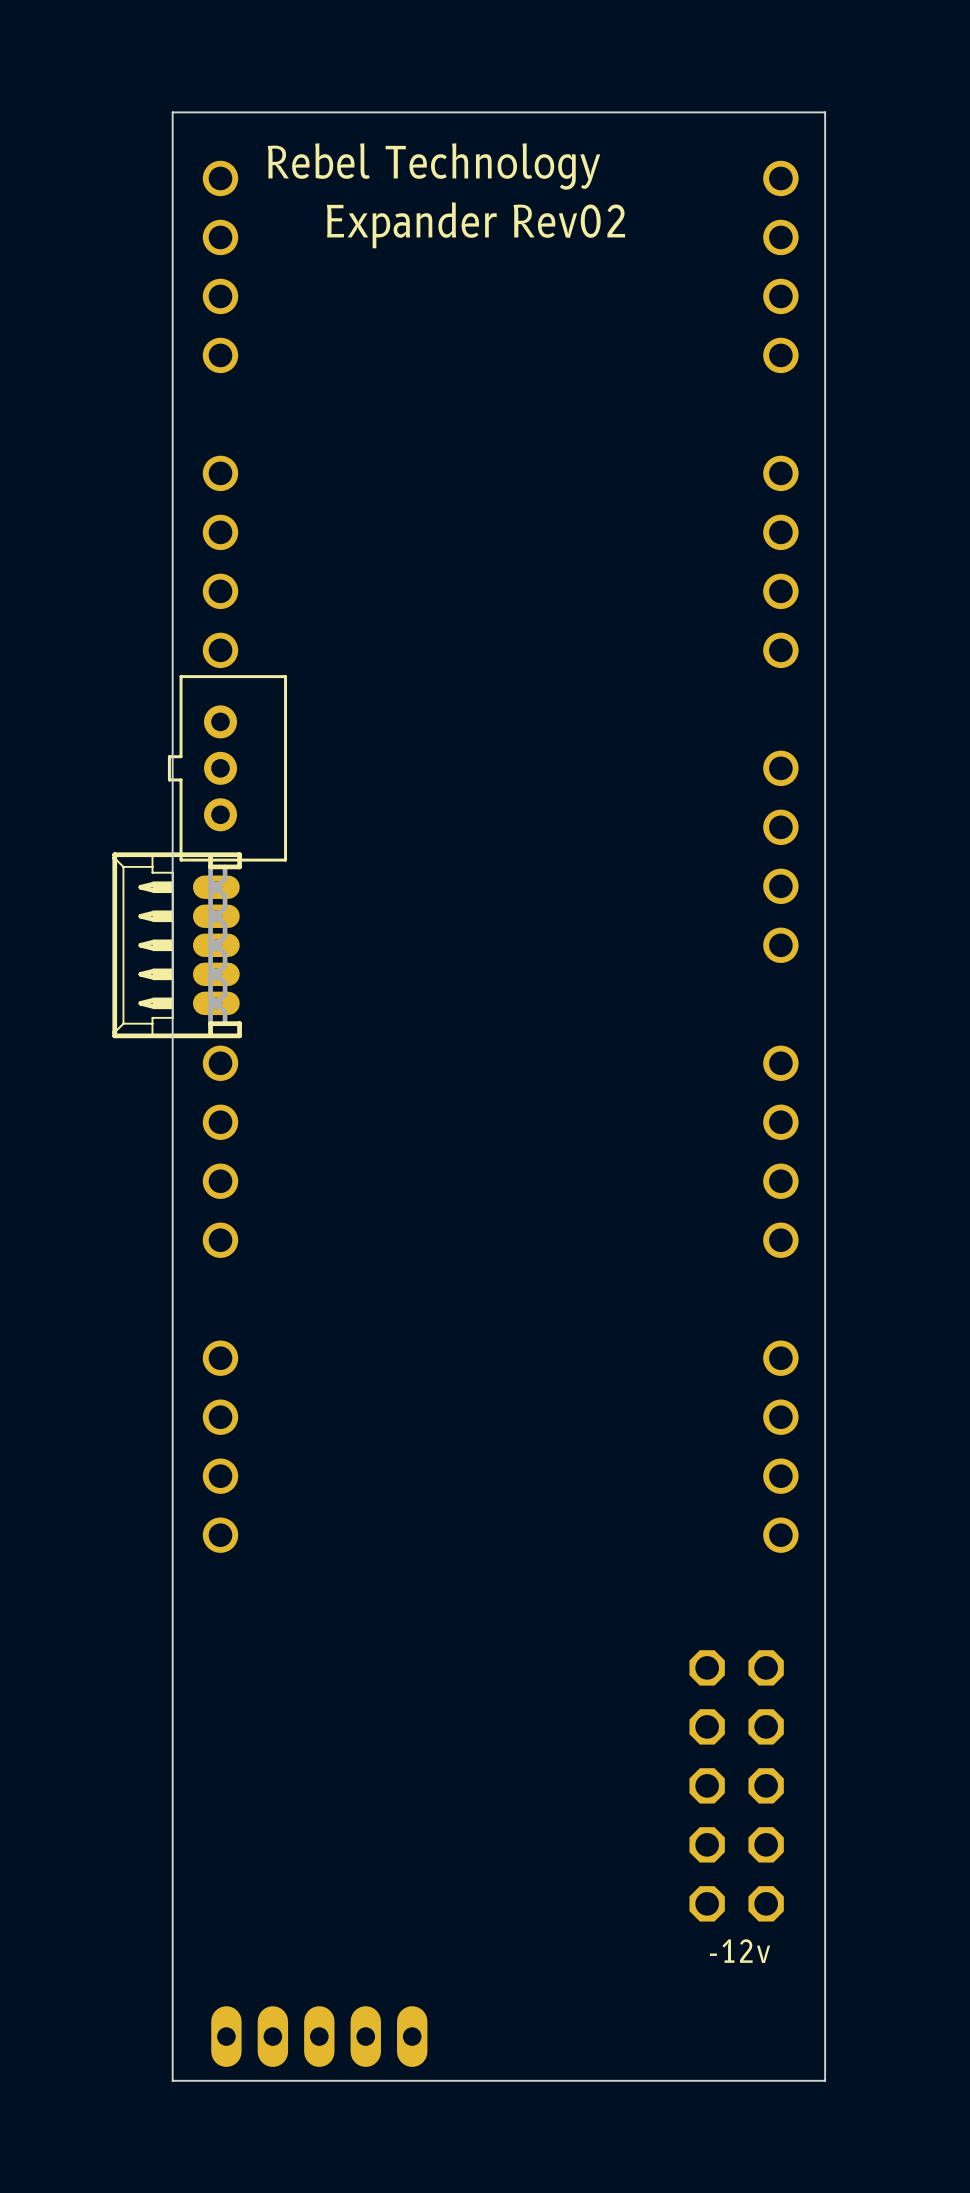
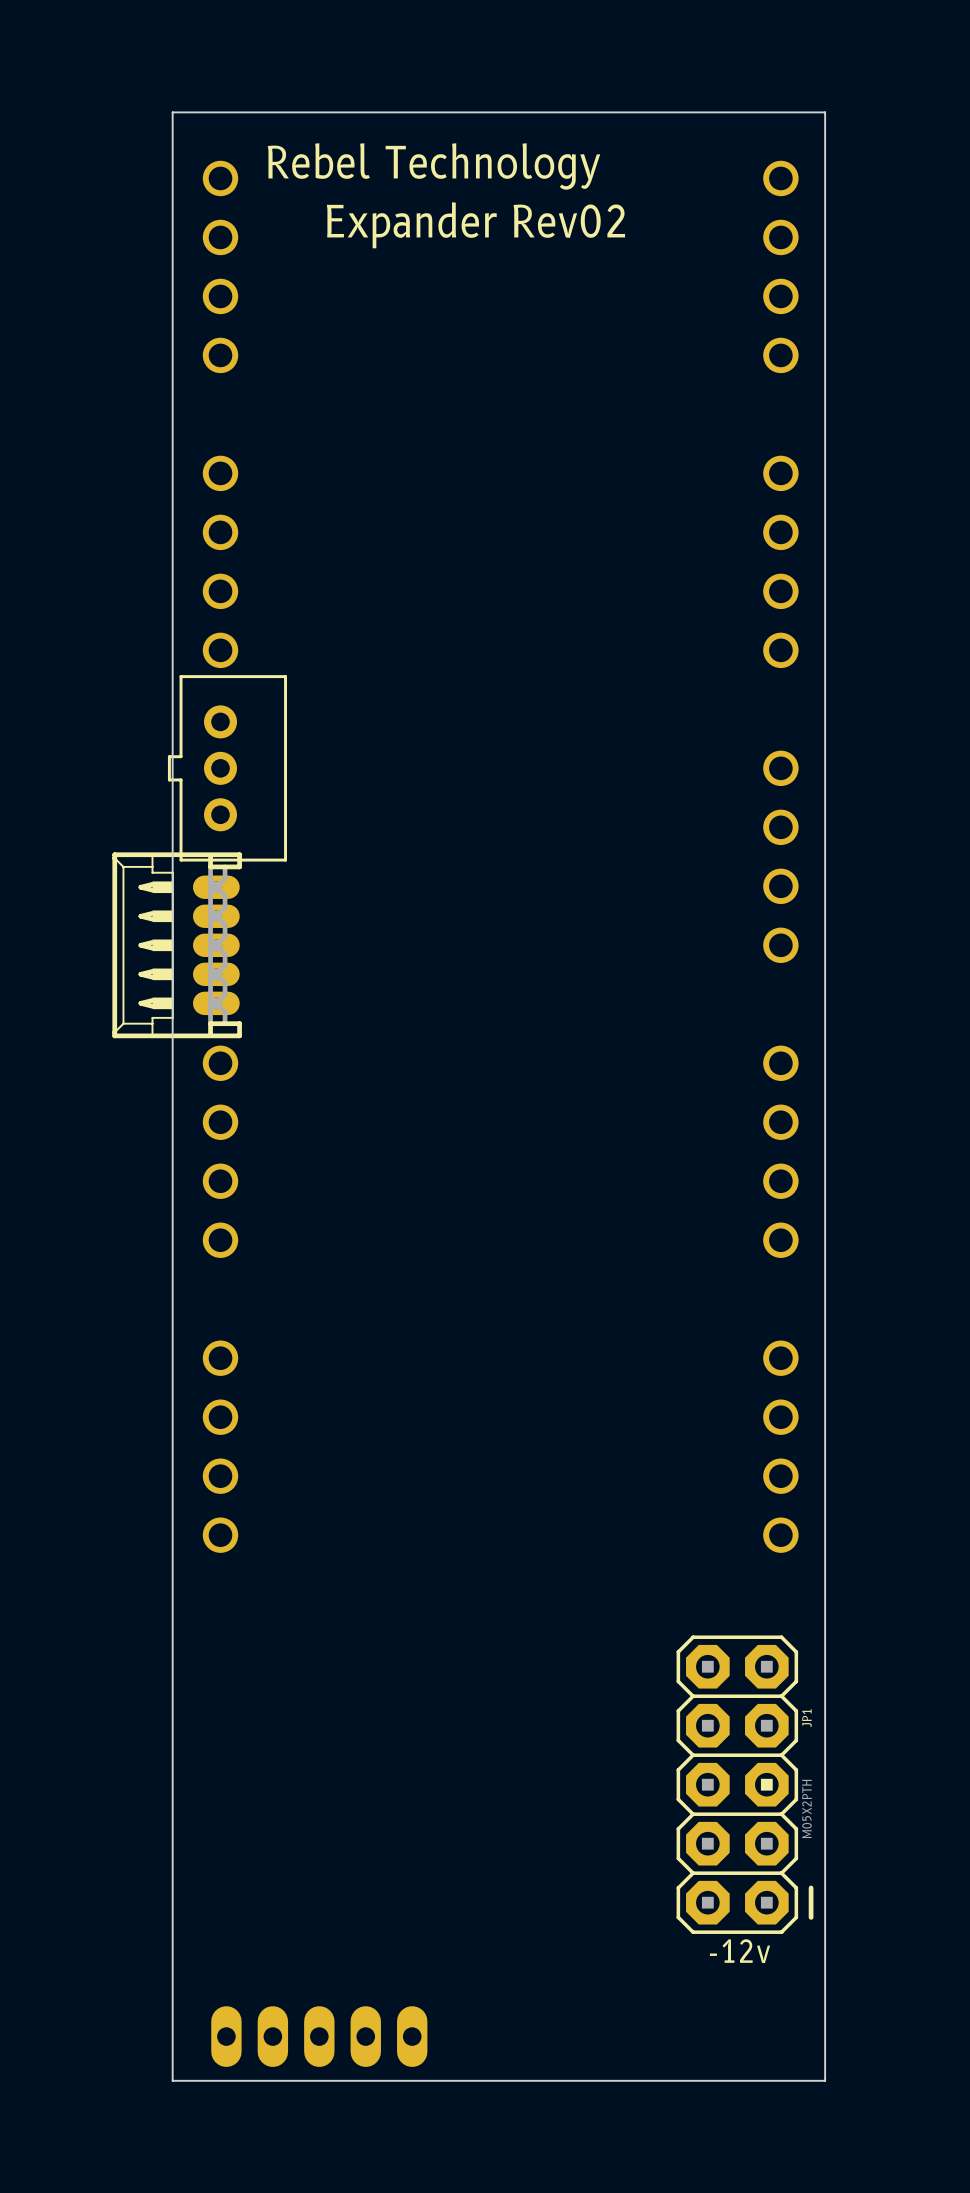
JP1: none -> M05X2PTH (745, 1784)
part: (736, 1785) -> none

